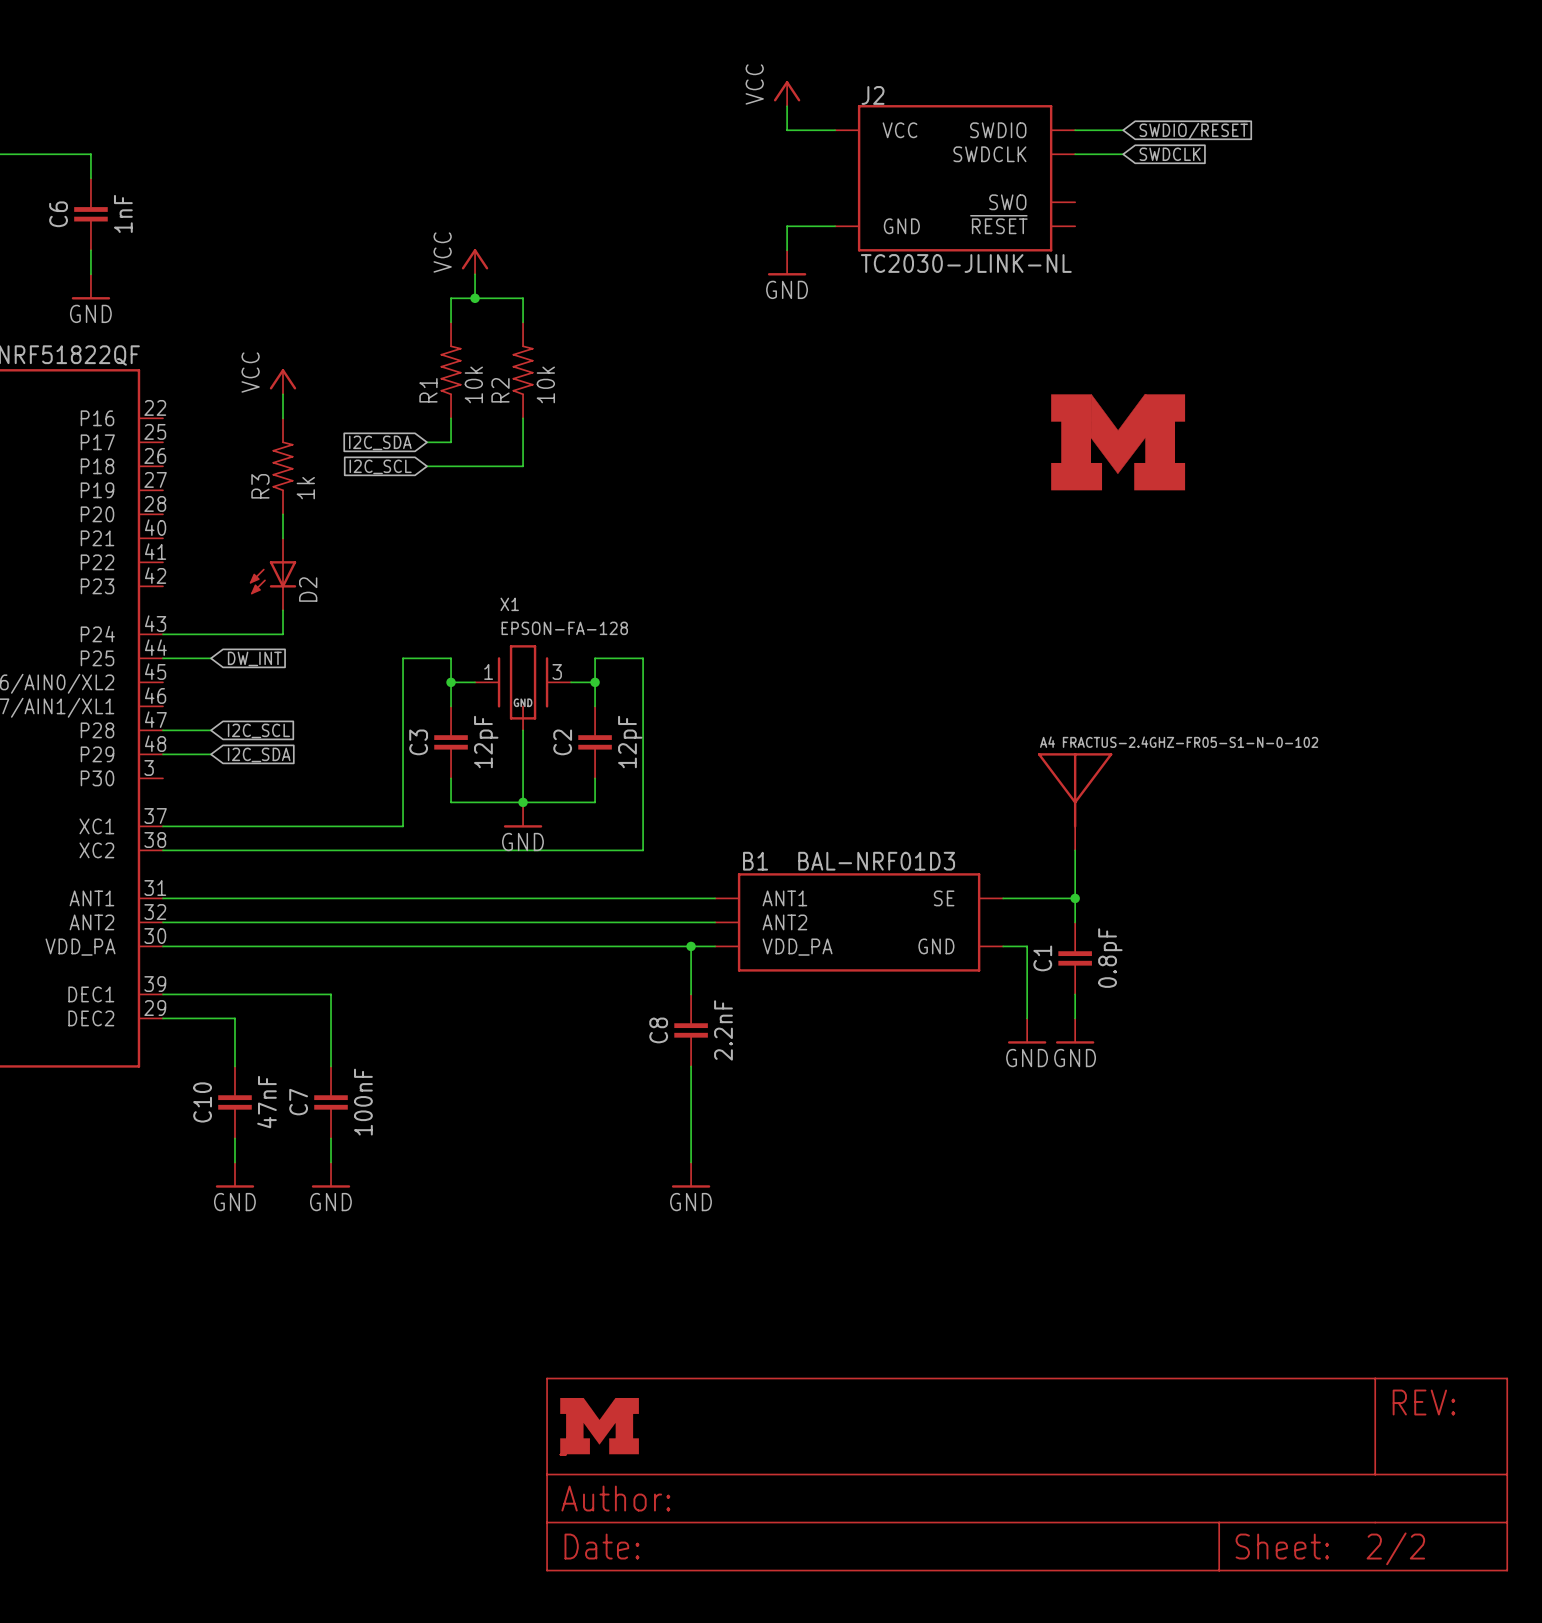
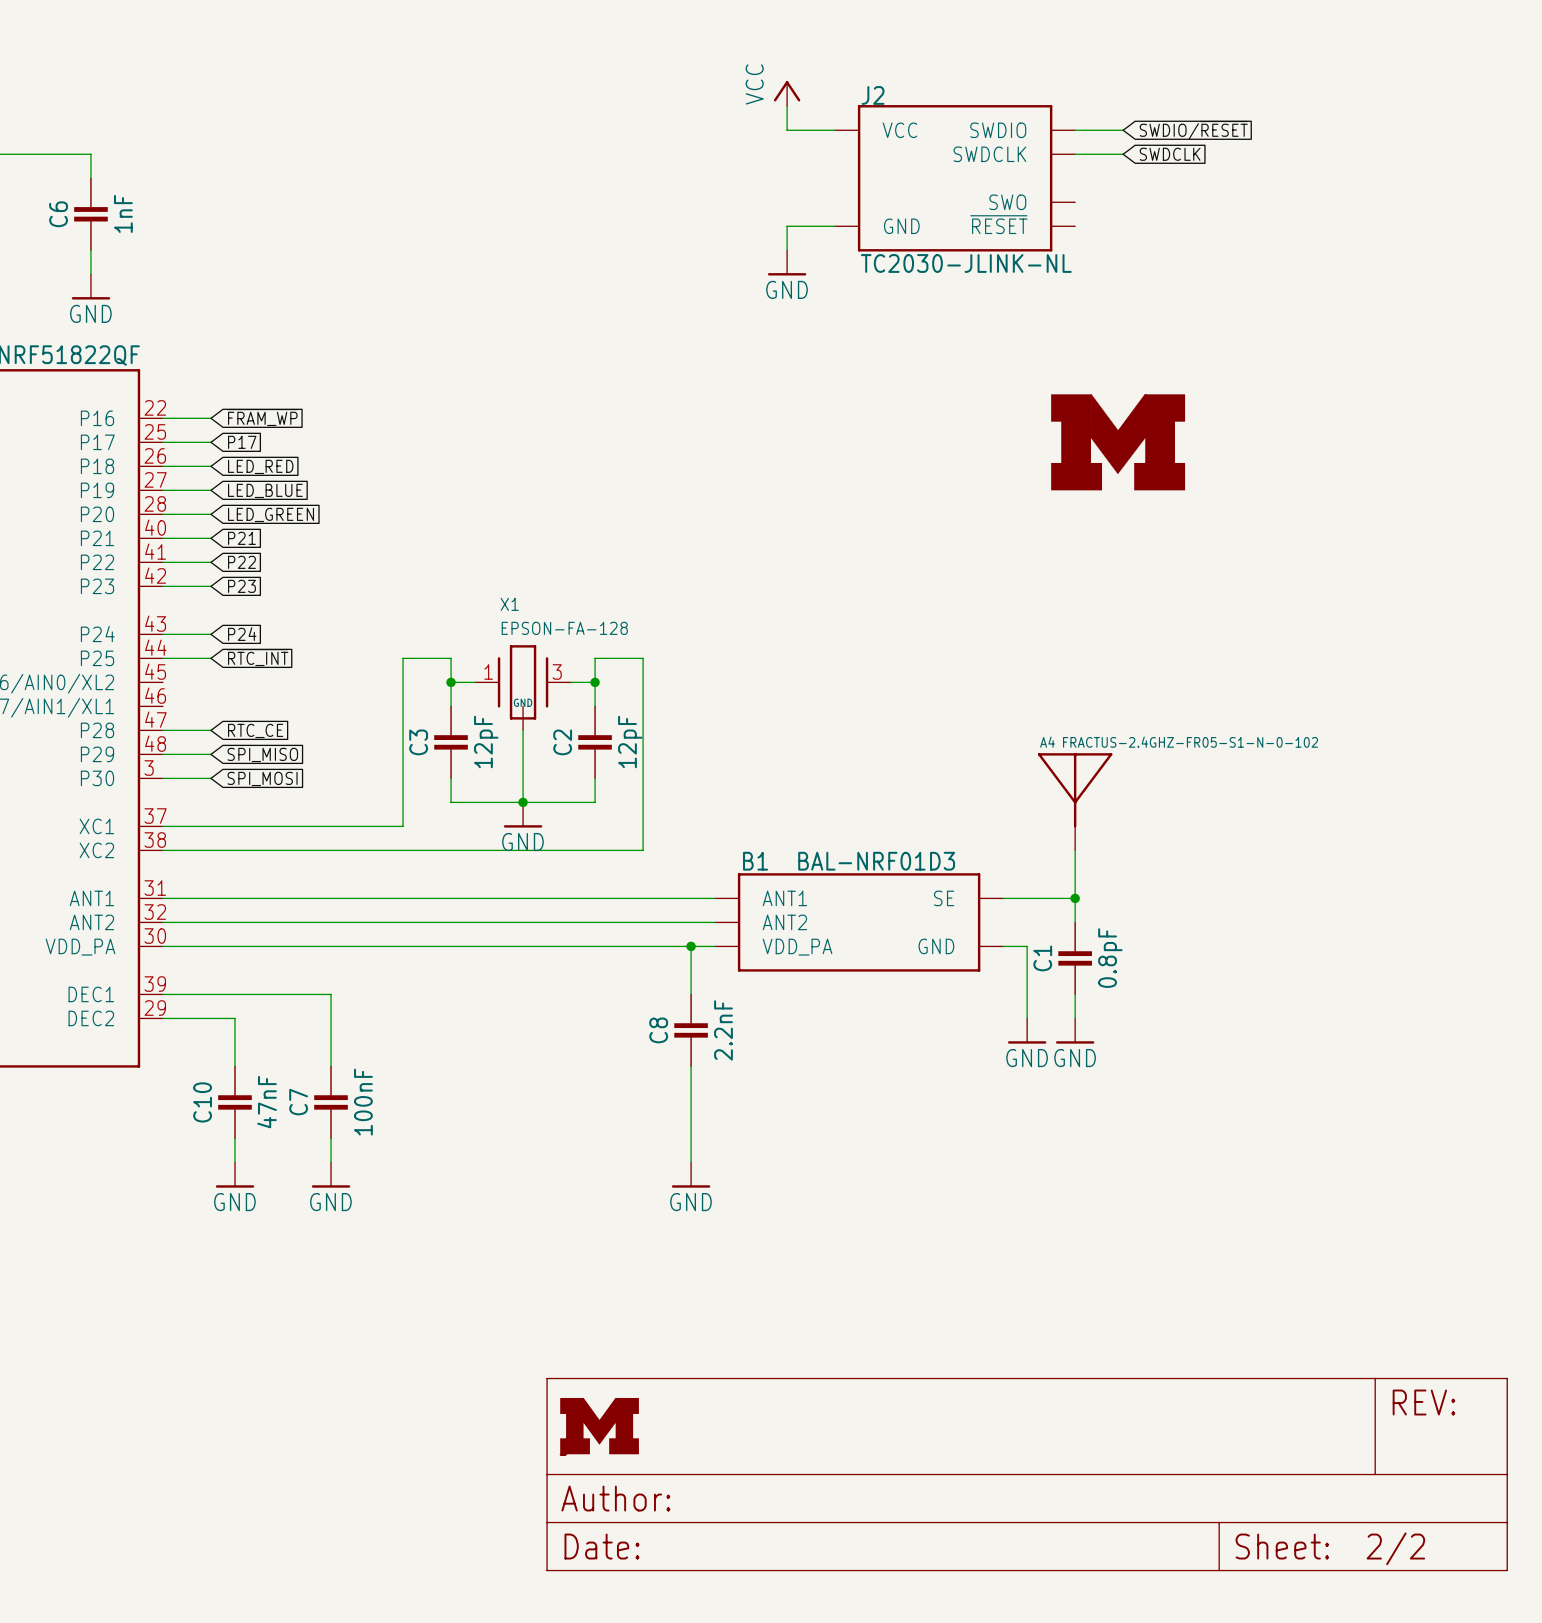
power symbol: VCC (475, 261) -> none
wire: (475, 274) (475, 298) -> none
junction: (475, 298) -> none
wire: (451, 322) (451, 298) (523, 298) (523, 322) -> none
R1: 10k (451, 370) -> none
R2: 10k (523, 370) -> none
power symbol: VCC (283, 381) -> none
wire: (283, 394) (283, 418) -> none
global label: none -> ~{FRAM_WP} (262, 417)
wire: none -> (162, 418) (210, 418)
wire: (451, 418) (451, 442) (427, 442) -> none
wire: (523, 418) (523, 466) (427, 466) -> none
wire: none -> (162, 442) (210, 442)
global label: none -> P17 (242, 442)
global label: I2C_SDA (380, 442) -> none
wire: none -> (162, 466) (210, 466)
global label: none -> LED_RED (260, 466)
R3: 1k (283, 466) -> none
global label: I2C_SCL (380, 466) -> none
wire: none -> (162, 490) (210, 490)
global label: none -> LED_BLUE (265, 490)
wire: none -> (162, 514) (210, 514)
global label: none -> LED_GREEN (271, 514)
wire: (283, 514) (283, 538) -> none
wire: none -> (162, 538) (210, 538)
global label: none -> P21 (241, 538)
wire: none -> (162, 562) (210, 562)
global label: none -> P22 (241, 562)
D2: (273, 574) -> none
wire: none -> (162, 586) (210, 586)
global label: none -> P23 (241, 586)
wire: (283, 610) (283, 634) (210, 634) -> none
global label: none -> P24 (242, 634)
global label: DW_INT (254, 658) -> ~{RTC_INT} (257, 657)
global label: I2C_SCL (258, 730) -> RTC_CE (255, 730)
global label: I2C_SDA (259, 754) -> SPI_MISO (262, 754)
wire: none -> (162, 778) (210, 778)
global label: none -> SPI_MOSI (262, 778)

